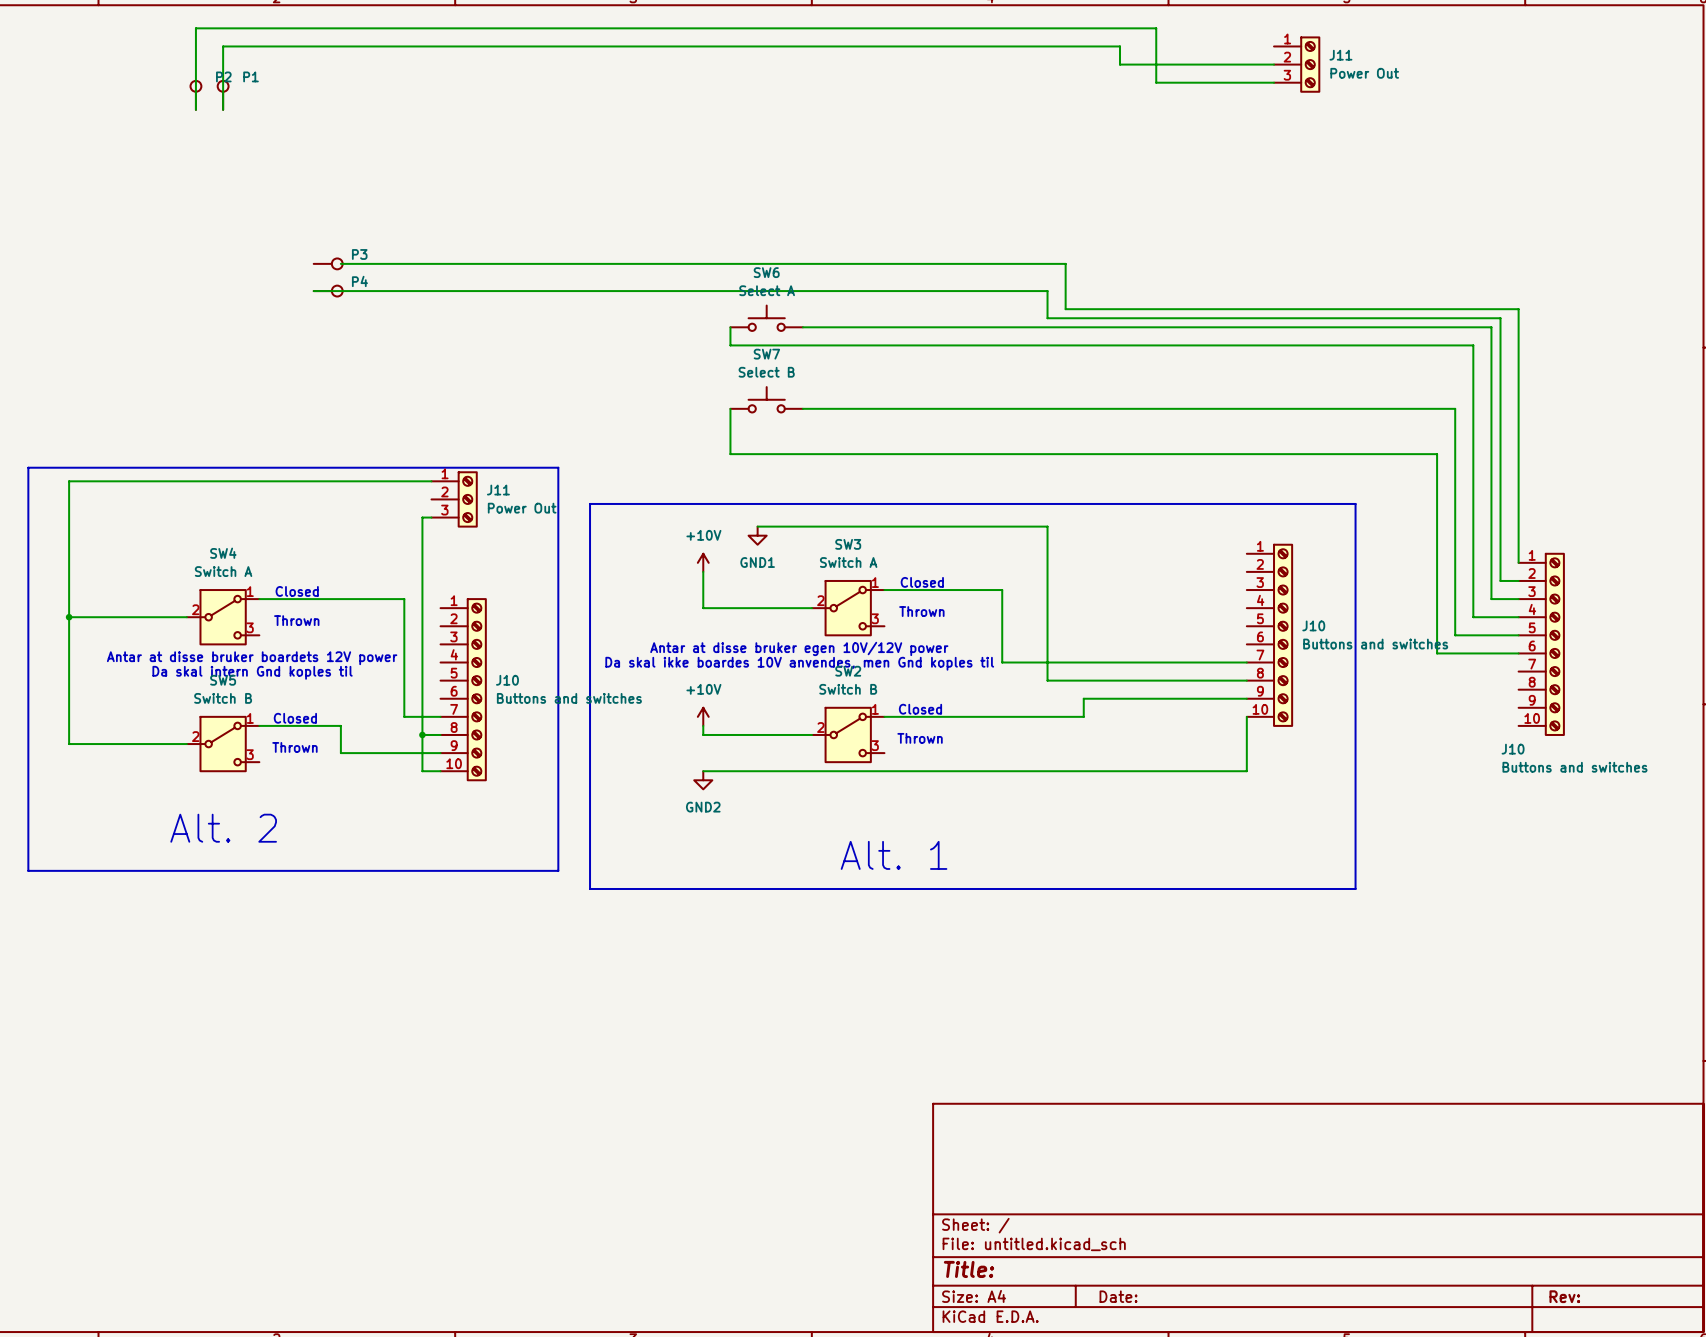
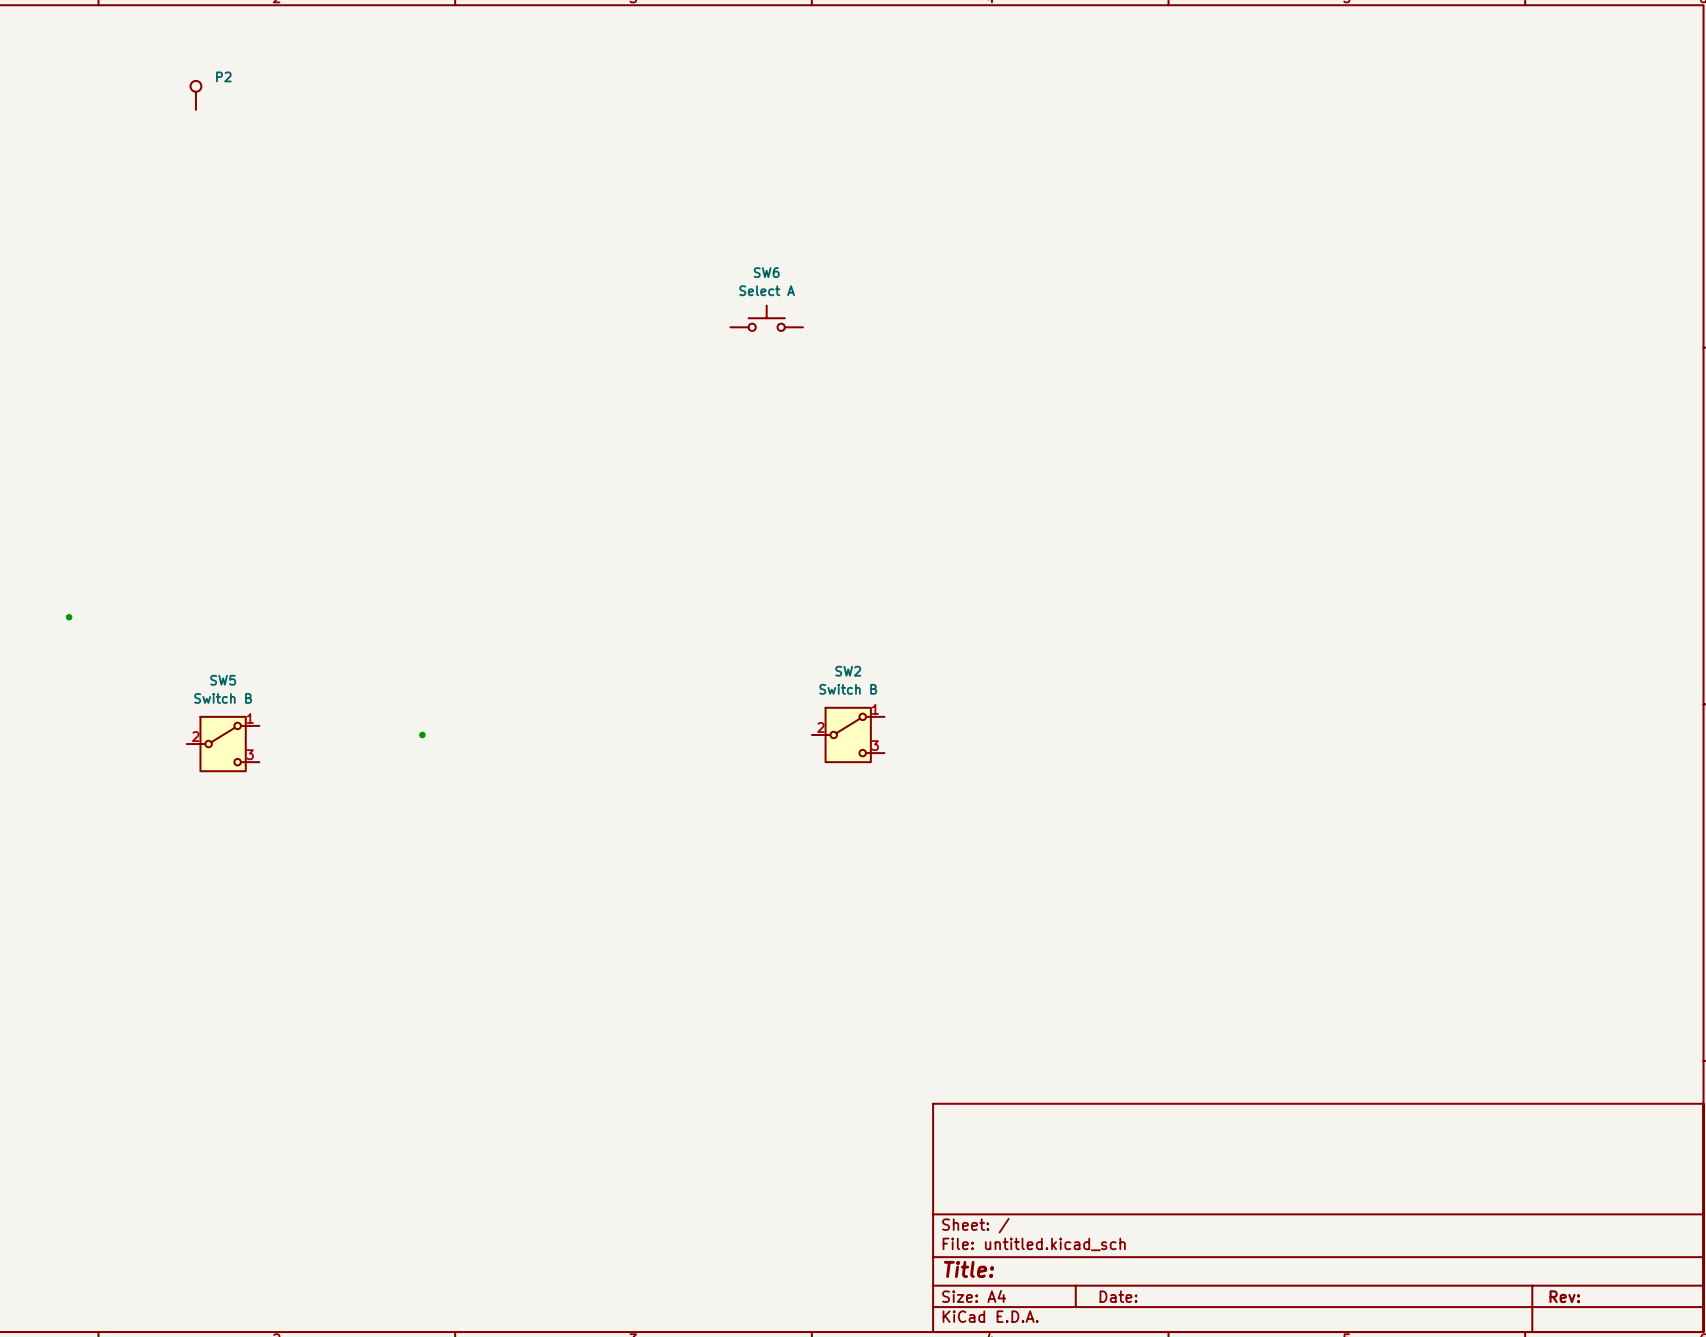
wire: (1274, 64) (1120, 64) (1120, 46) (223, 46) (223, 109) -> none
J11: Power Out (1297, 64) -> none
wire: (1274, 82) (1156, 82) (1156, 28) (195, 28) (195, 109) -> none
P1: (223, 95) -> none
P3: (328, 263) -> none
wire: (340, 263) (1065, 263) (1065, 309) (1518, 309) (1518, 562) -> none
wire: (313, 291) (1047, 291) (1047, 318) (1500, 318) (1500, 580) (1518, 580) -> none
P4: (328, 291) -> none
wire: (730, 327) (730, 345) (1473, 345) (1473, 617) (1518, 617) -> none
wire: (802, 327) (1491, 327) (1491, 599) (1518, 599) -> none
SW7: Select B (766, 399) -> none
wire: (730, 408) (730, 454) (1437, 454) (1437, 653) (1518, 653) -> none
wire: (802, 408) (1455, 408) (1455, 635) (1518, 635) -> none
line: (28, 467) (558, 467) (558, 870) (28, 870) (28, 467) -> none
wire: (431, 481) (69, 481) (69, 744) (186, 744) -> none
J11: Power Out (454, 499) -> none
line: (590, 503) (1355, 503) (1355, 888) (590, 888) (590, 503) -> none
wire: (431, 517) (422, 517) (422, 771) (440, 771) -> none
wire: (757, 526) (1047, 526) (1047, 680) (1246, 680) -> none
power symbol: GND1 (757, 535) -> none
power symbol: +10V (703, 562) -> none
wire: (703, 571) (703, 608) (811, 608) -> none
text: Closed (922, 582) -> none
wire: (884, 590) (1002, 590) (1002, 662) (1246, 662) -> none
text: Closed (297, 591) -> none
wire: (259, 599) (404, 599) (404, 716) (440, 716) -> none
SW3: Switch A (848, 608) -> none
text: Thrown (921, 611) -> none
wire: (69, 617) (186, 617) -> none
SW4: Switch A (223, 617) -> none
text: Thrown (296, 620) -> none
J10: Buttons and switches (1269, 635) -> none
J10: Buttons and switches (1541, 644) -> none
text: Antar at disse bruker egen 10V/12V power (799, 648) -> none
text: Antar at disse bruker boardets 12V power (252, 658) -> none
text: Da skal ikke boardes 10V anvendes, men Gnd koples til (799, 663) -> none
text: Da skal intern Gnd koples til (252, 672) -> none
J10: Buttons and switches (463, 689) -> none
wire: (1246, 698) (1083, 698) (1083, 716) (884, 716) -> none
text: Closed (920, 709) -> none
power symbol: +10V (703, 716) -> none
wire: (1246, 716) (1246, 771) (703, 771) -> none
text: Closed (295, 718) -> none
wire: (259, 725) (340, 725) (340, 753) (440, 753) -> none
wire: (703, 725) (703, 734) (811, 734) -> none
wire: (422, 734) (440, 734) -> none
text: Thrown (920, 738) -> none
text: Thrown (294, 747) -> none
power symbol: GND2 (703, 780) -> none
text: Alt. 2 (223, 828) -> none
text: Alt. 1 (894, 855) -> none

